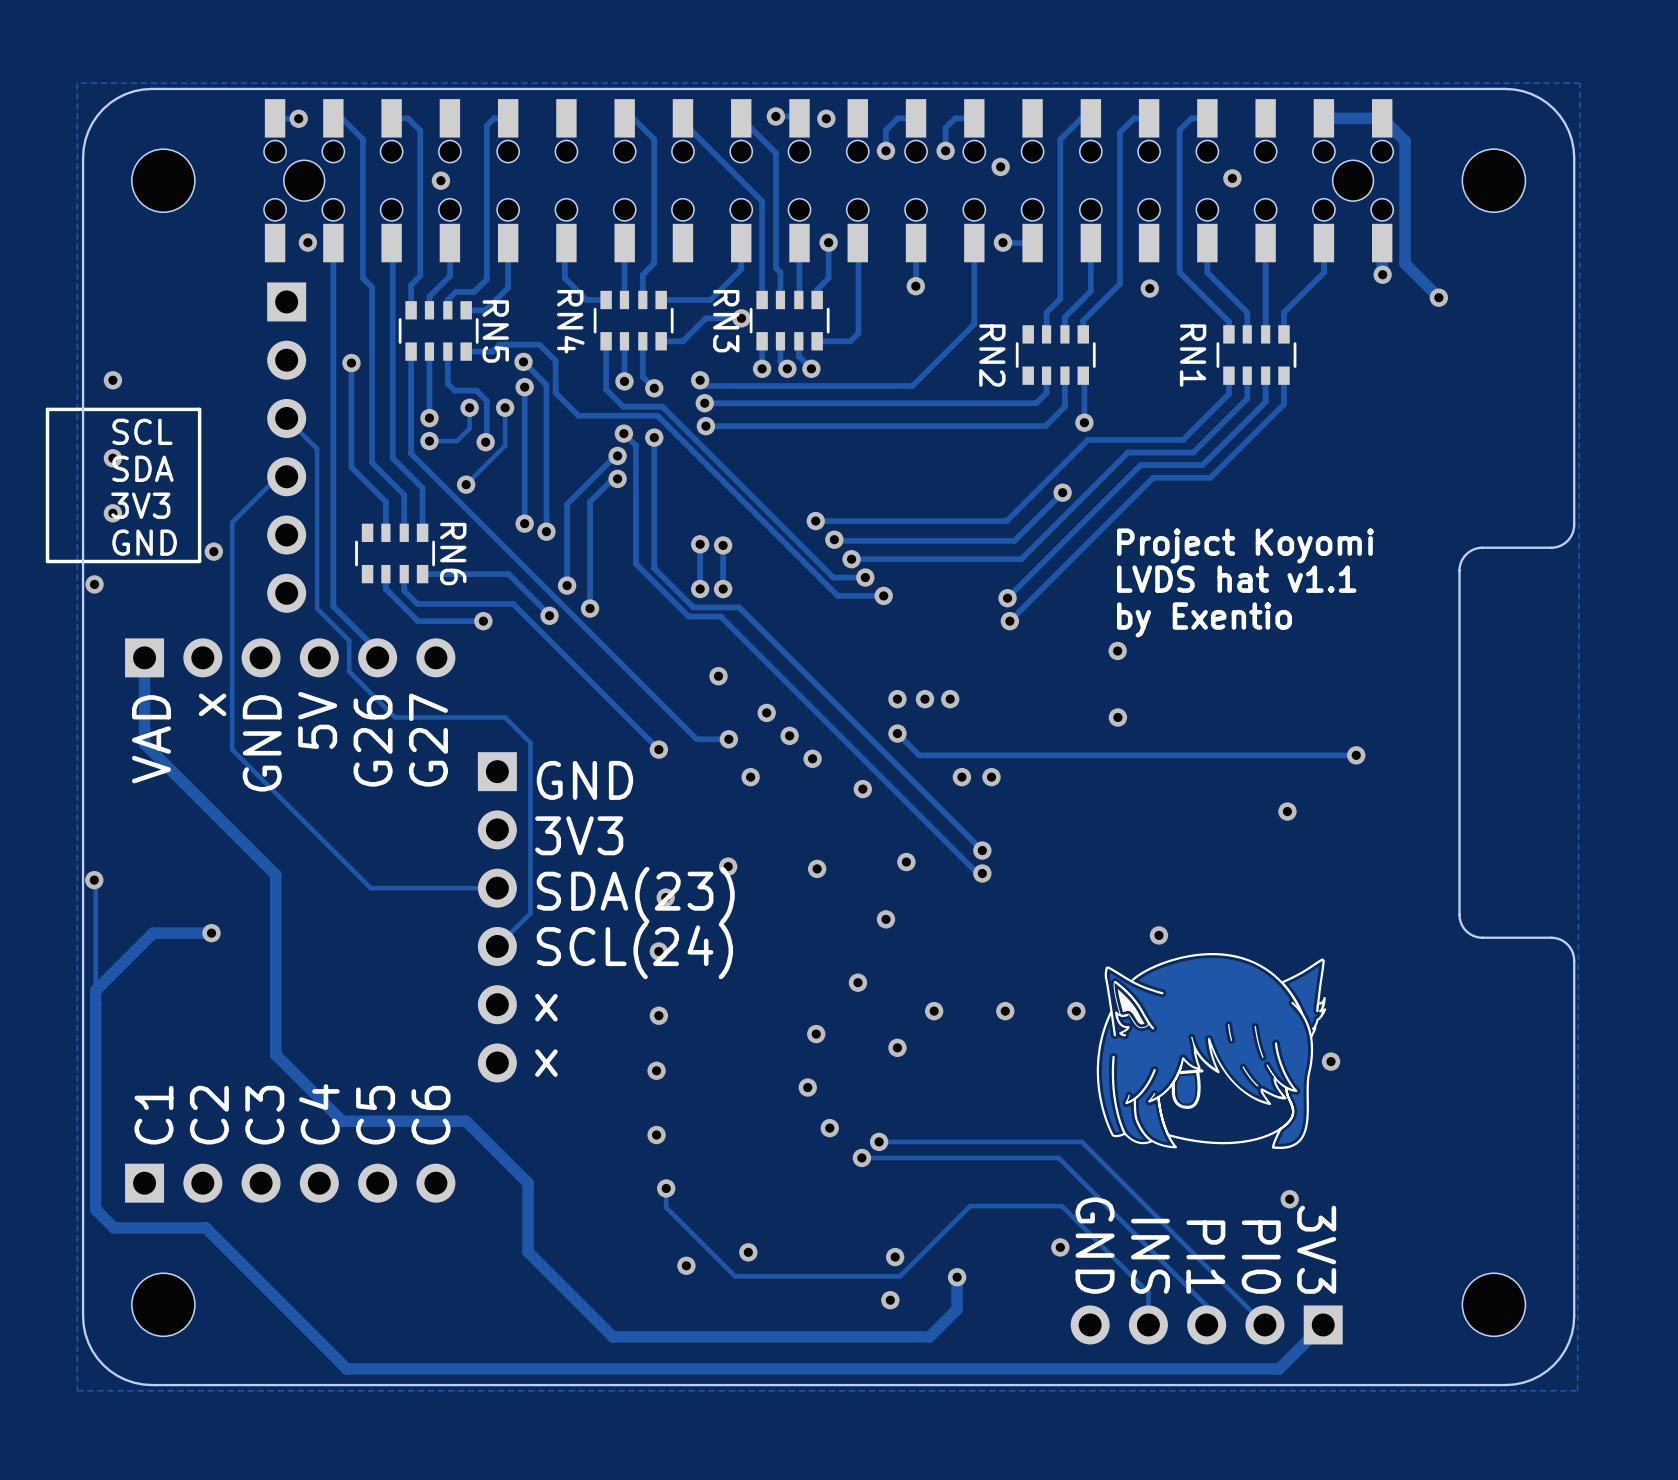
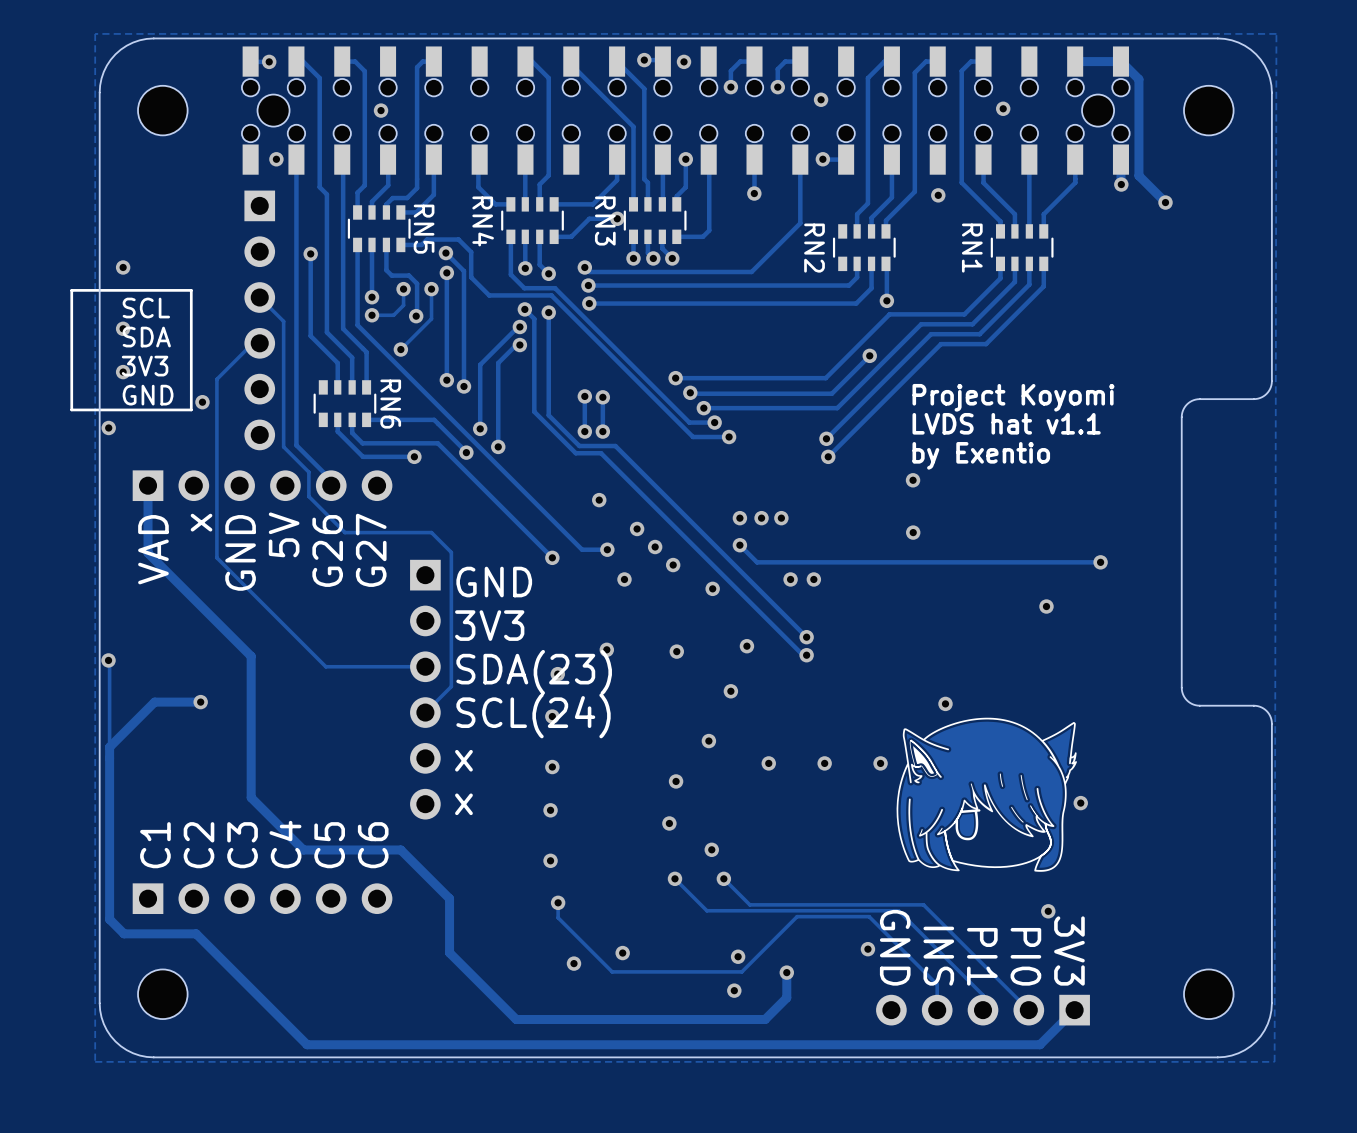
via: (897, 1047) -> none
via: none -> (711, 849)
via: (829, 1128) -> none
track: (879, 1141) (1081, 1141) (1131, 1191) -> (723, 878) (749, 904) (923, 904)
via: (879, 1141) -> none
via: none -> (674, 878)
track: (861, 1157) (1058, 1157) (1099, 1198) -> (674, 878) (706, 910) (898, 910)
via: (861, 1157) -> none
via: none -> (723, 878)

